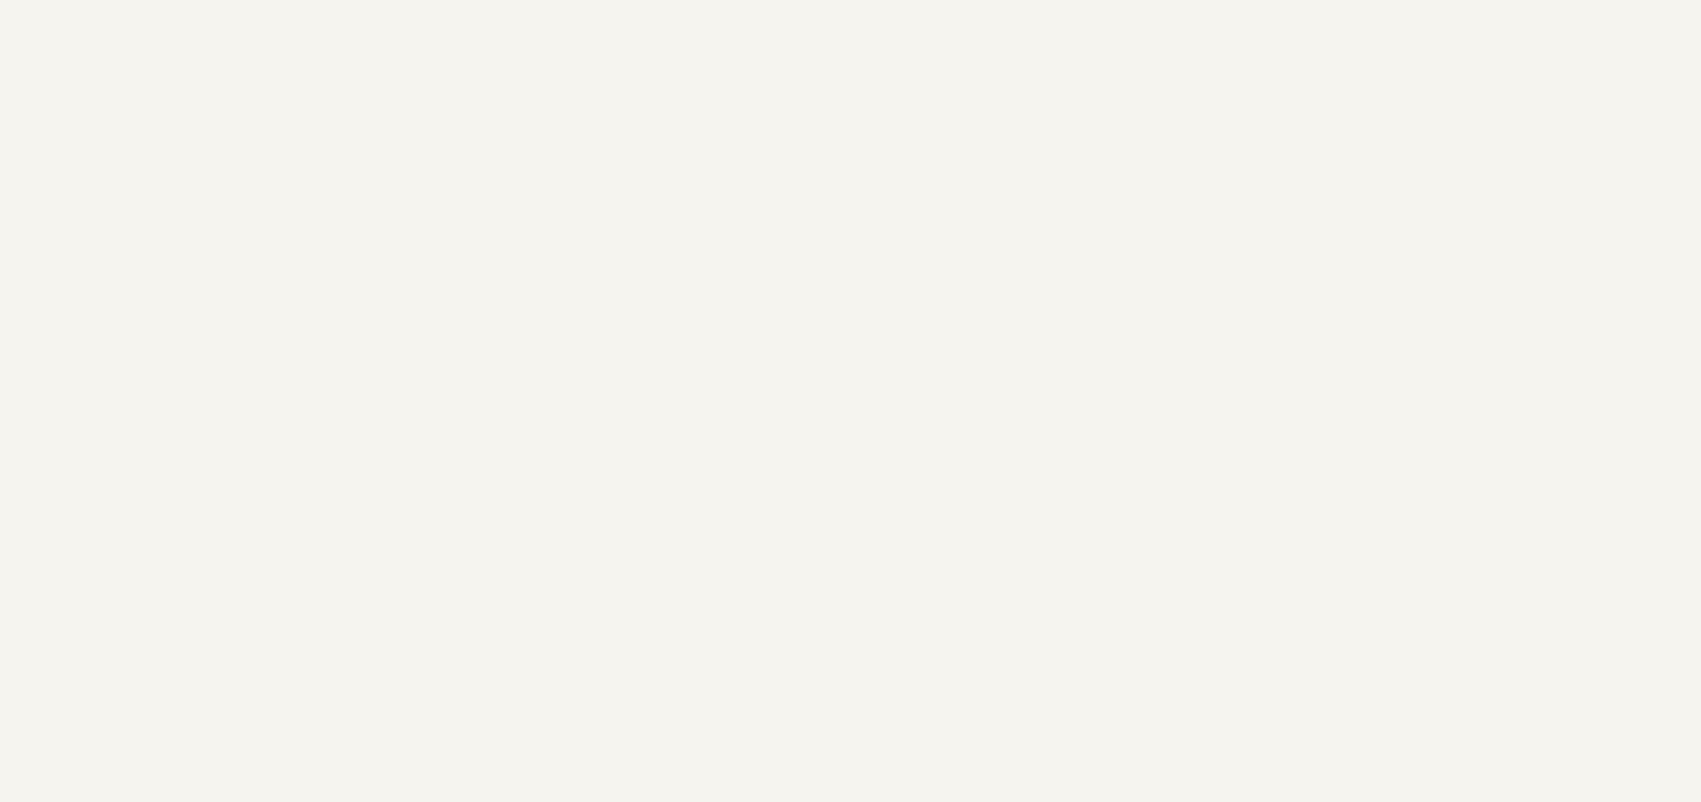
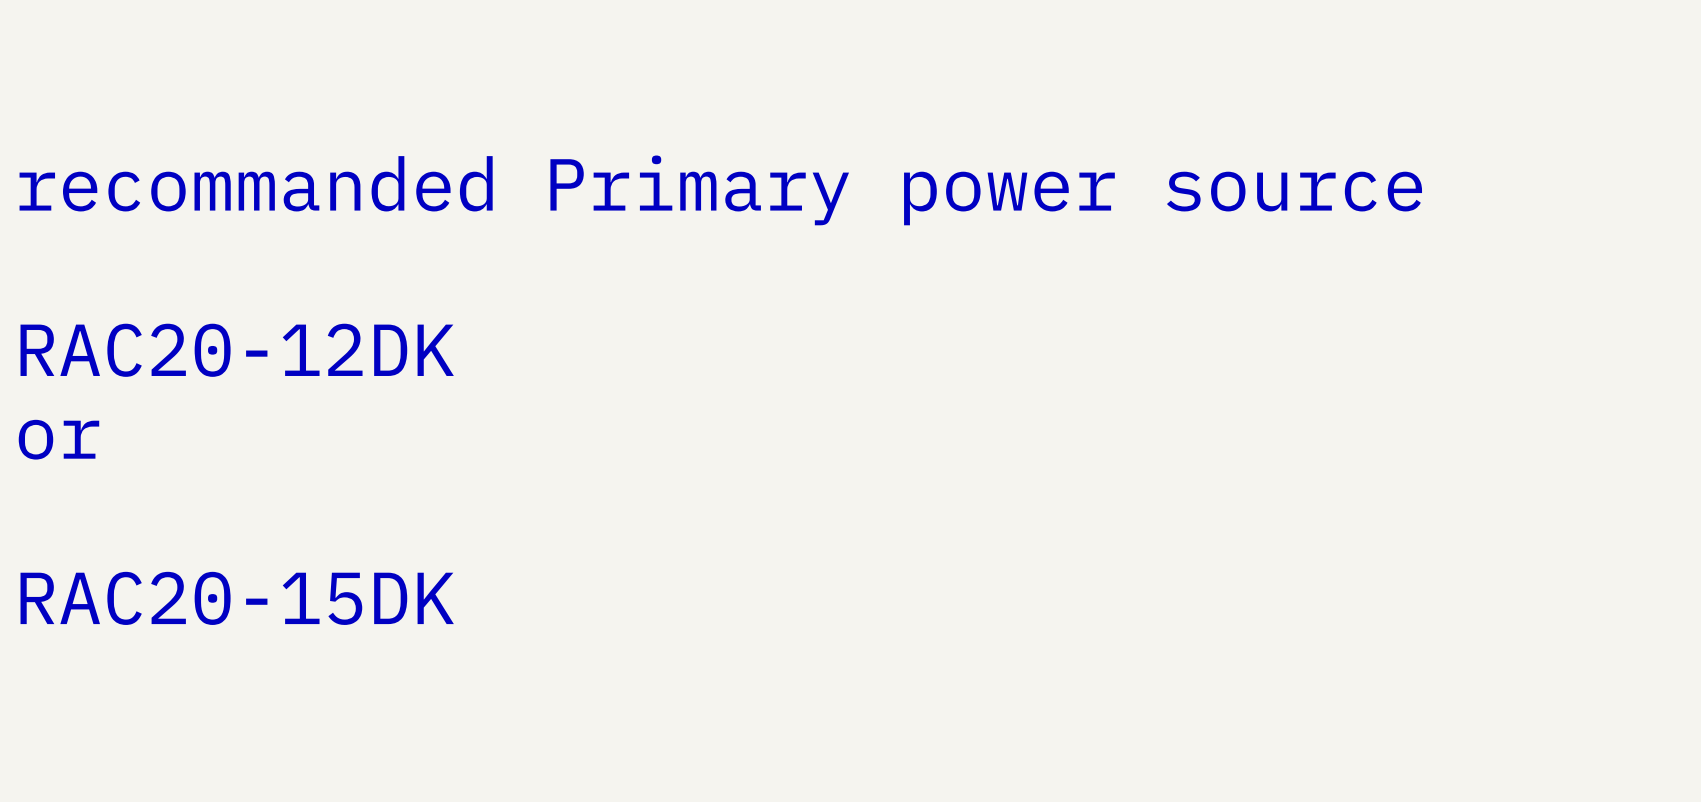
text: none -> recommanded Primary power source (720, 190)
text: none -> RAC20-12DK (237, 350)
text: none -> or (58, 439)
text: none -> RAC20-15DK (237, 598)

